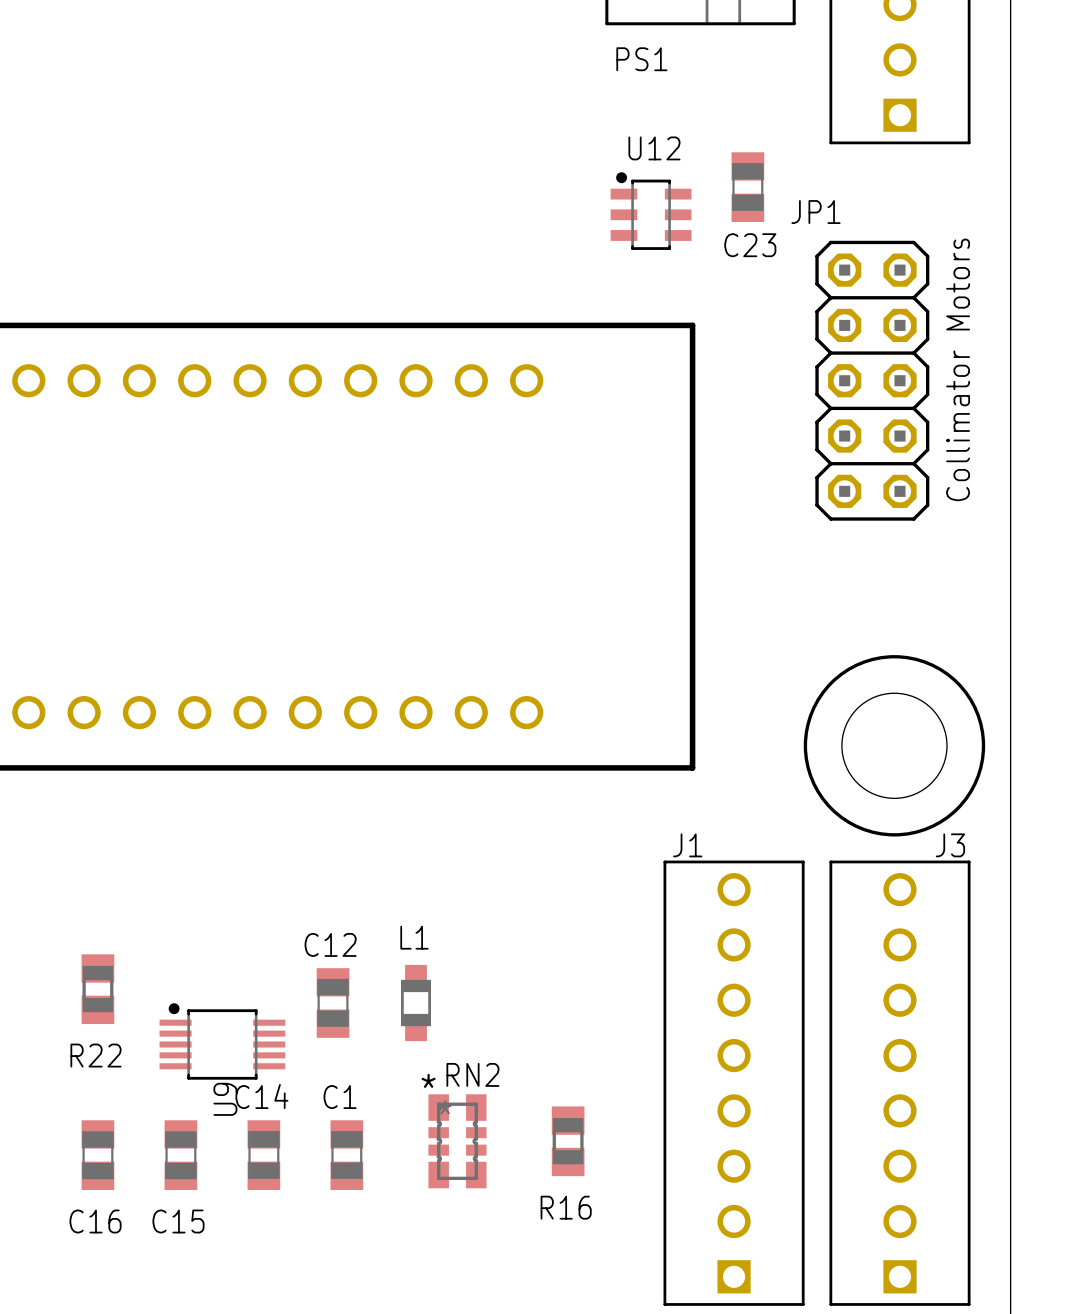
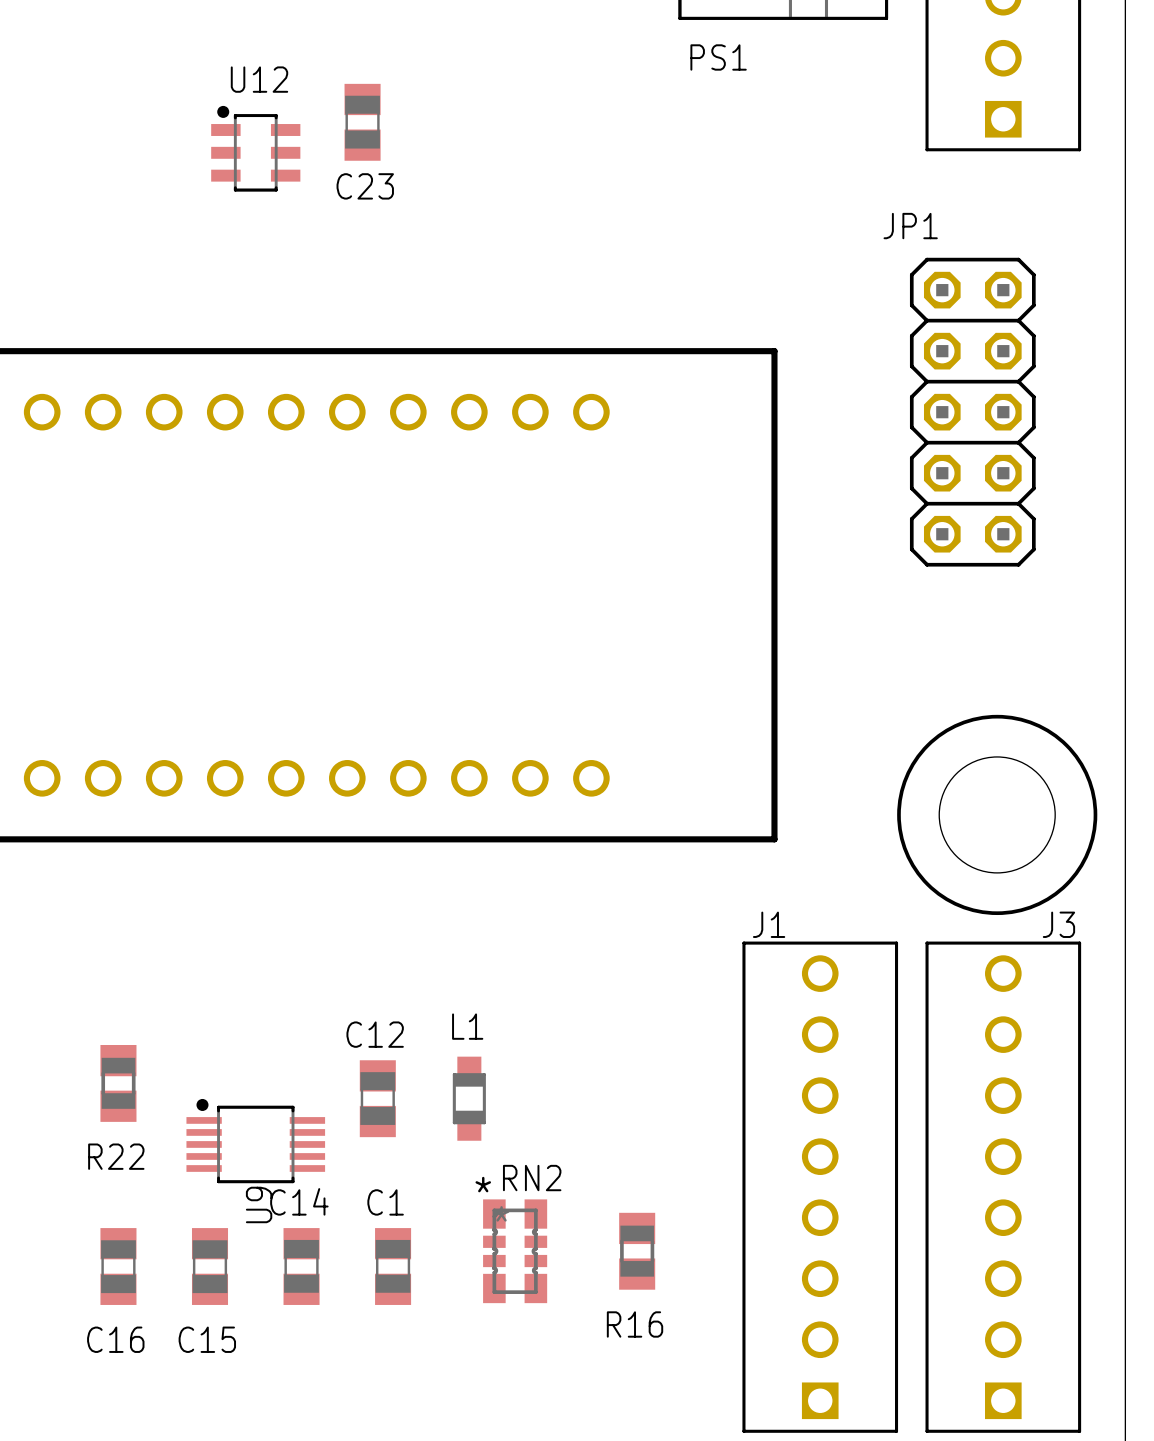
C23 position: (747, 187) -> (362, 122)
U12 position: (651, 211) -> (255, 148)
text: Collimator Motors (958, 369) -> none

